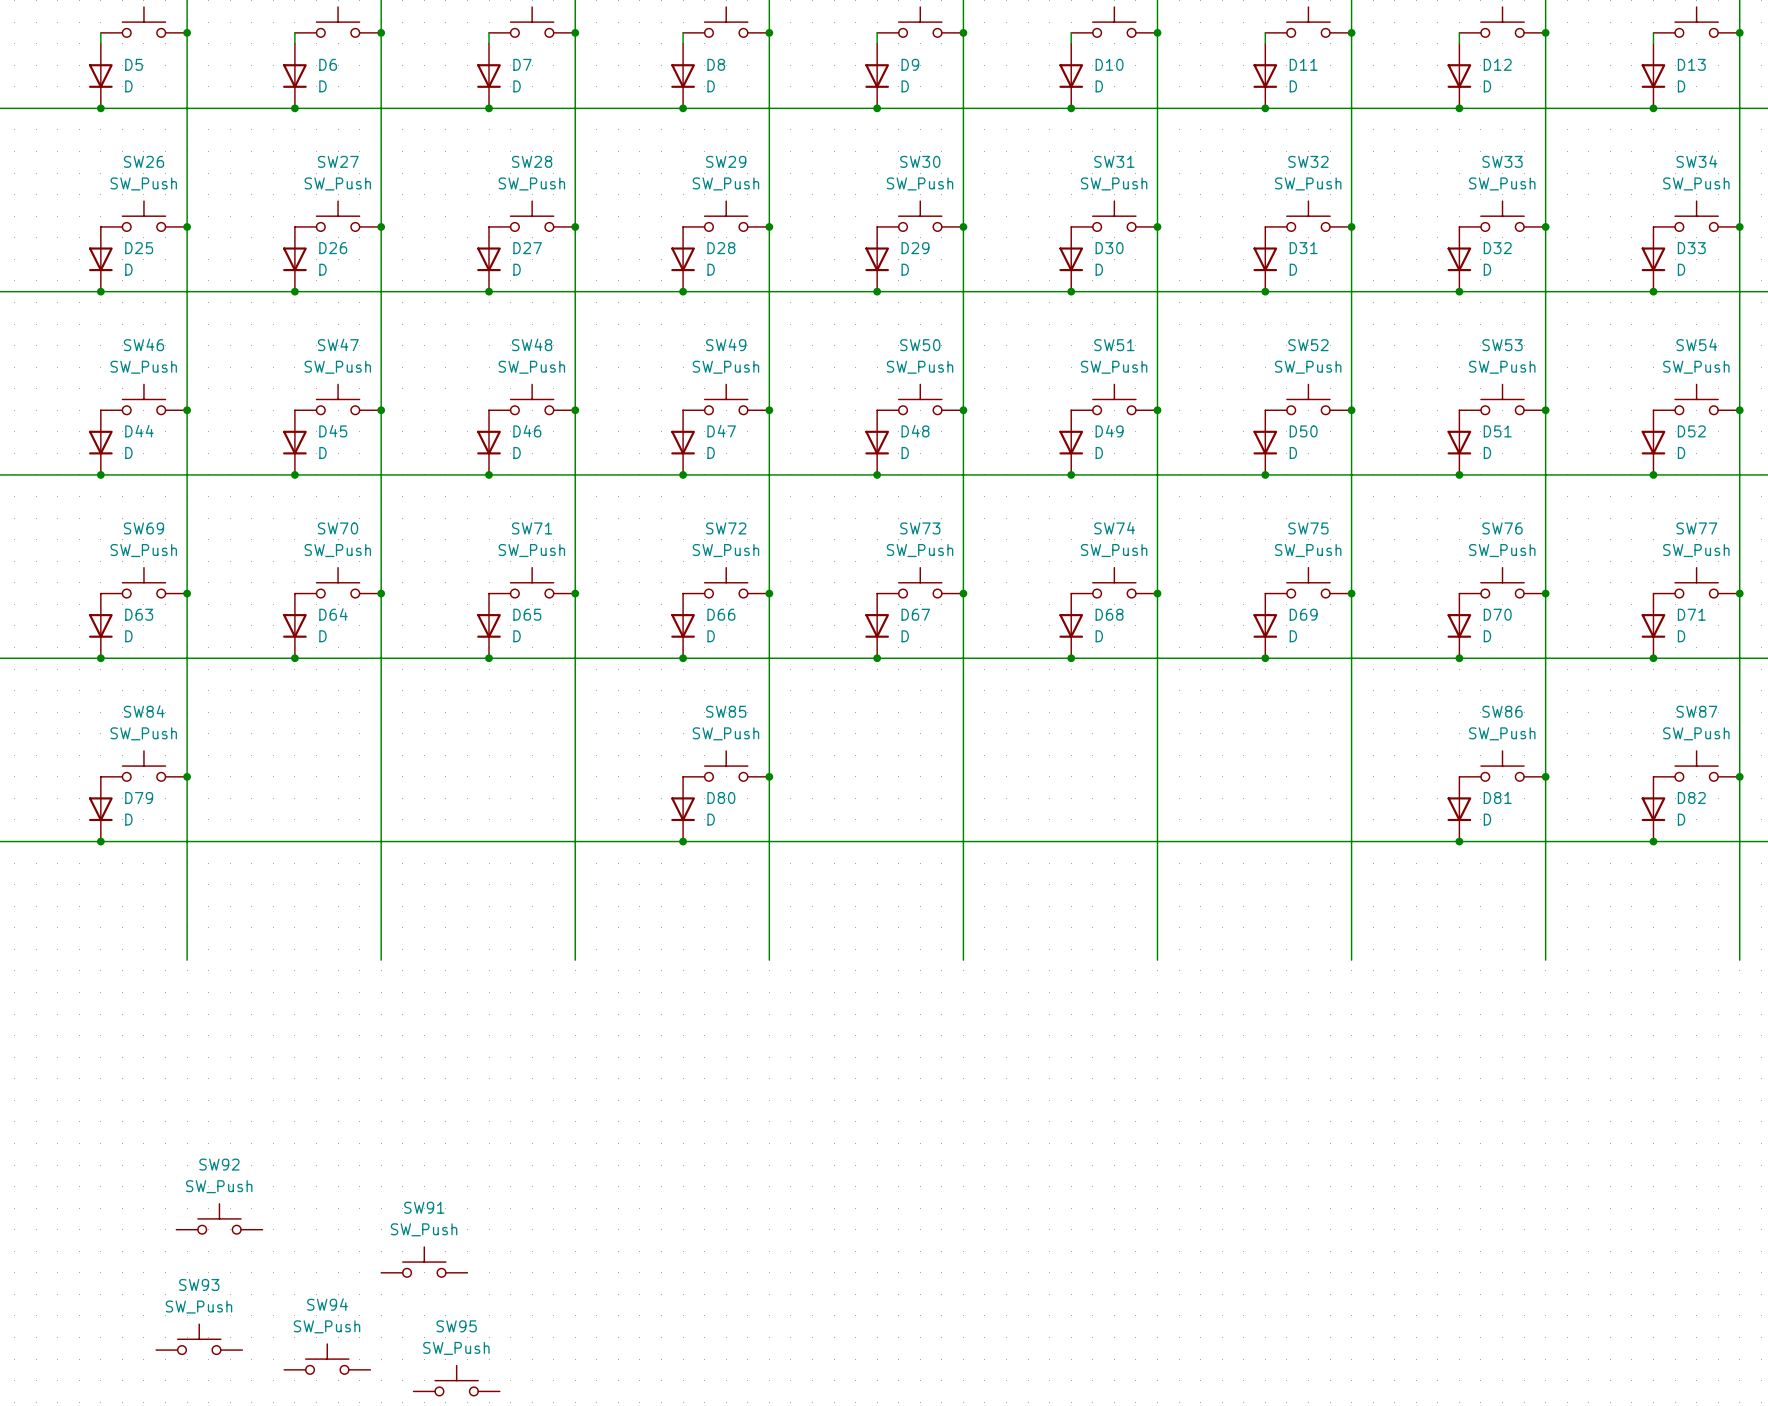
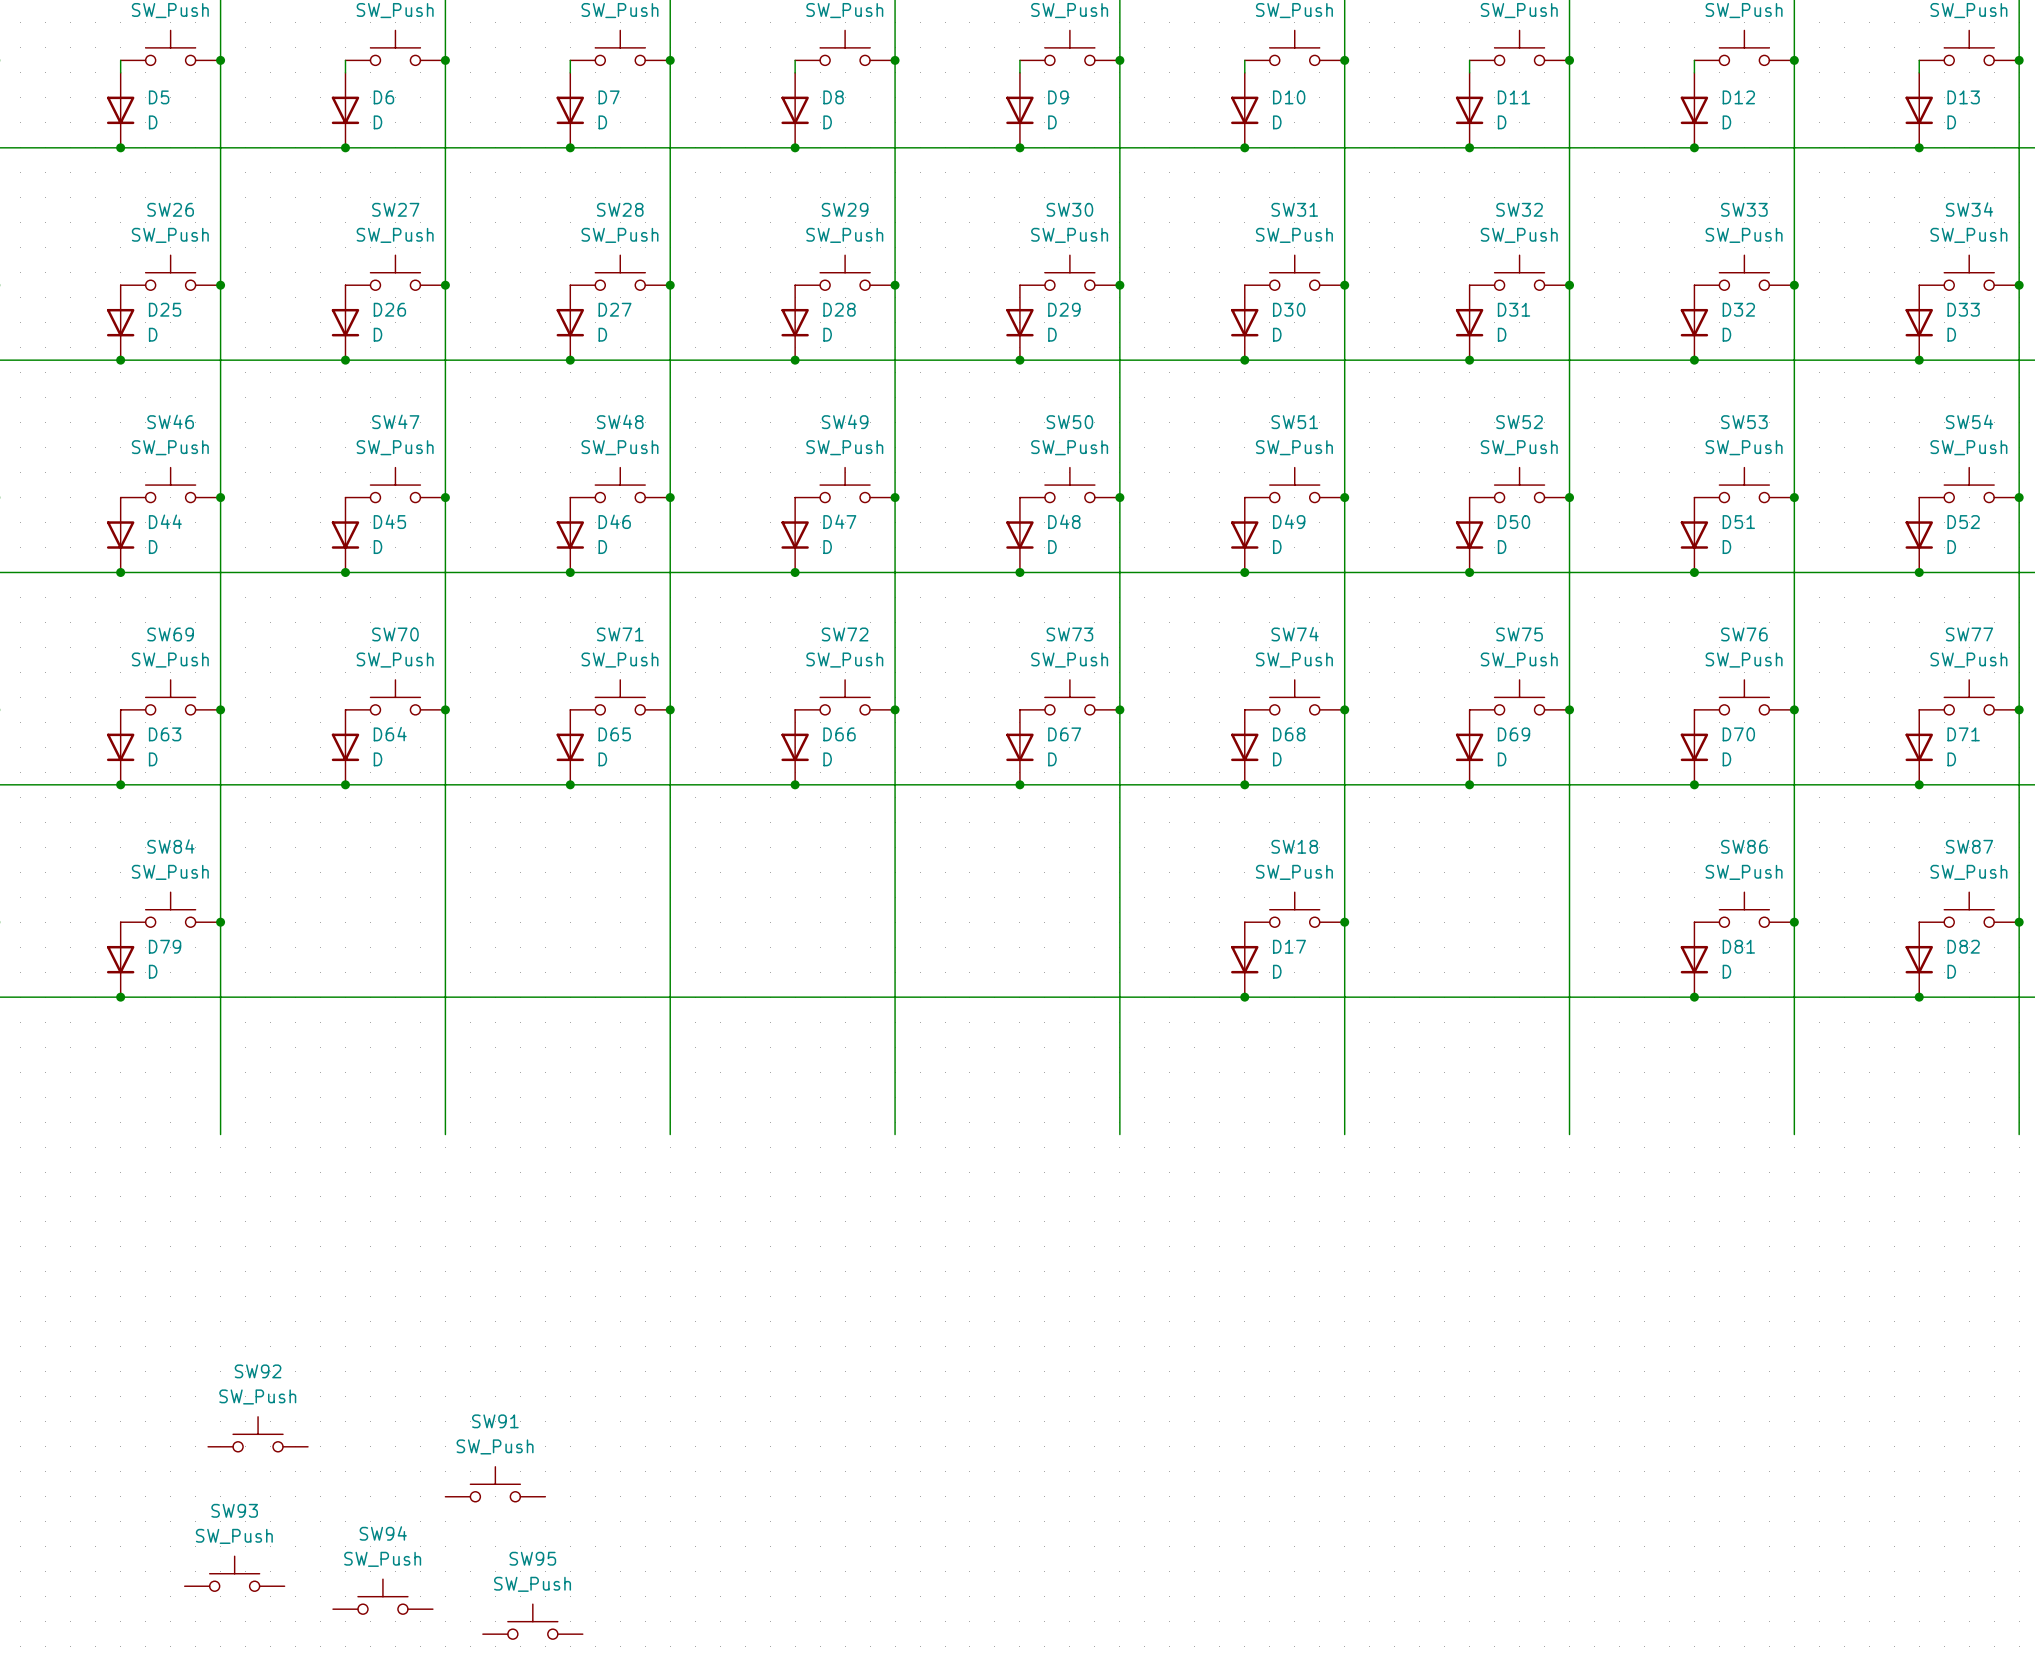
SW85: SW_Push (726, 766) -> none
SW18: none -> SW_Push (1294, 909)
junction: (769, 776) -> none
junction: none -> (1344, 922)
D80: D (683, 809) -> none
D17: none -> D (1244, 959)
junction: (683, 841) -> none
junction: none -> (1244, 997)

